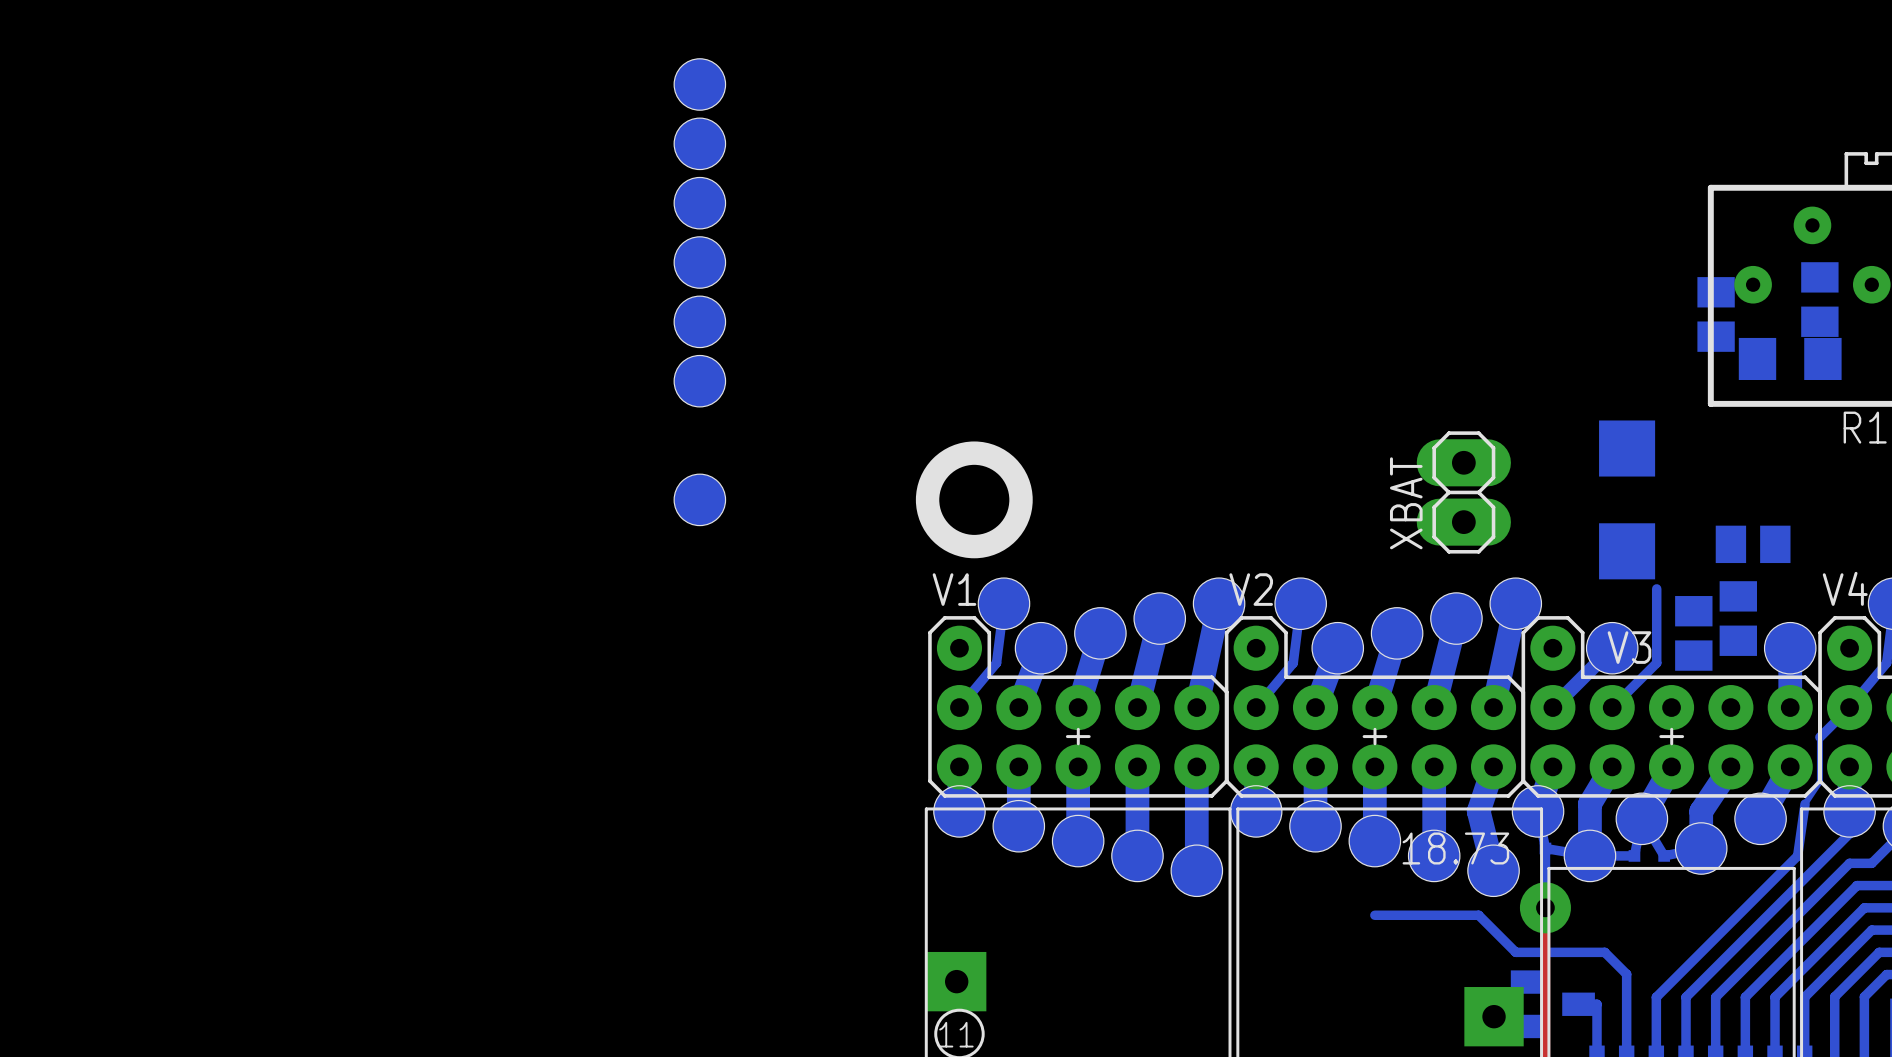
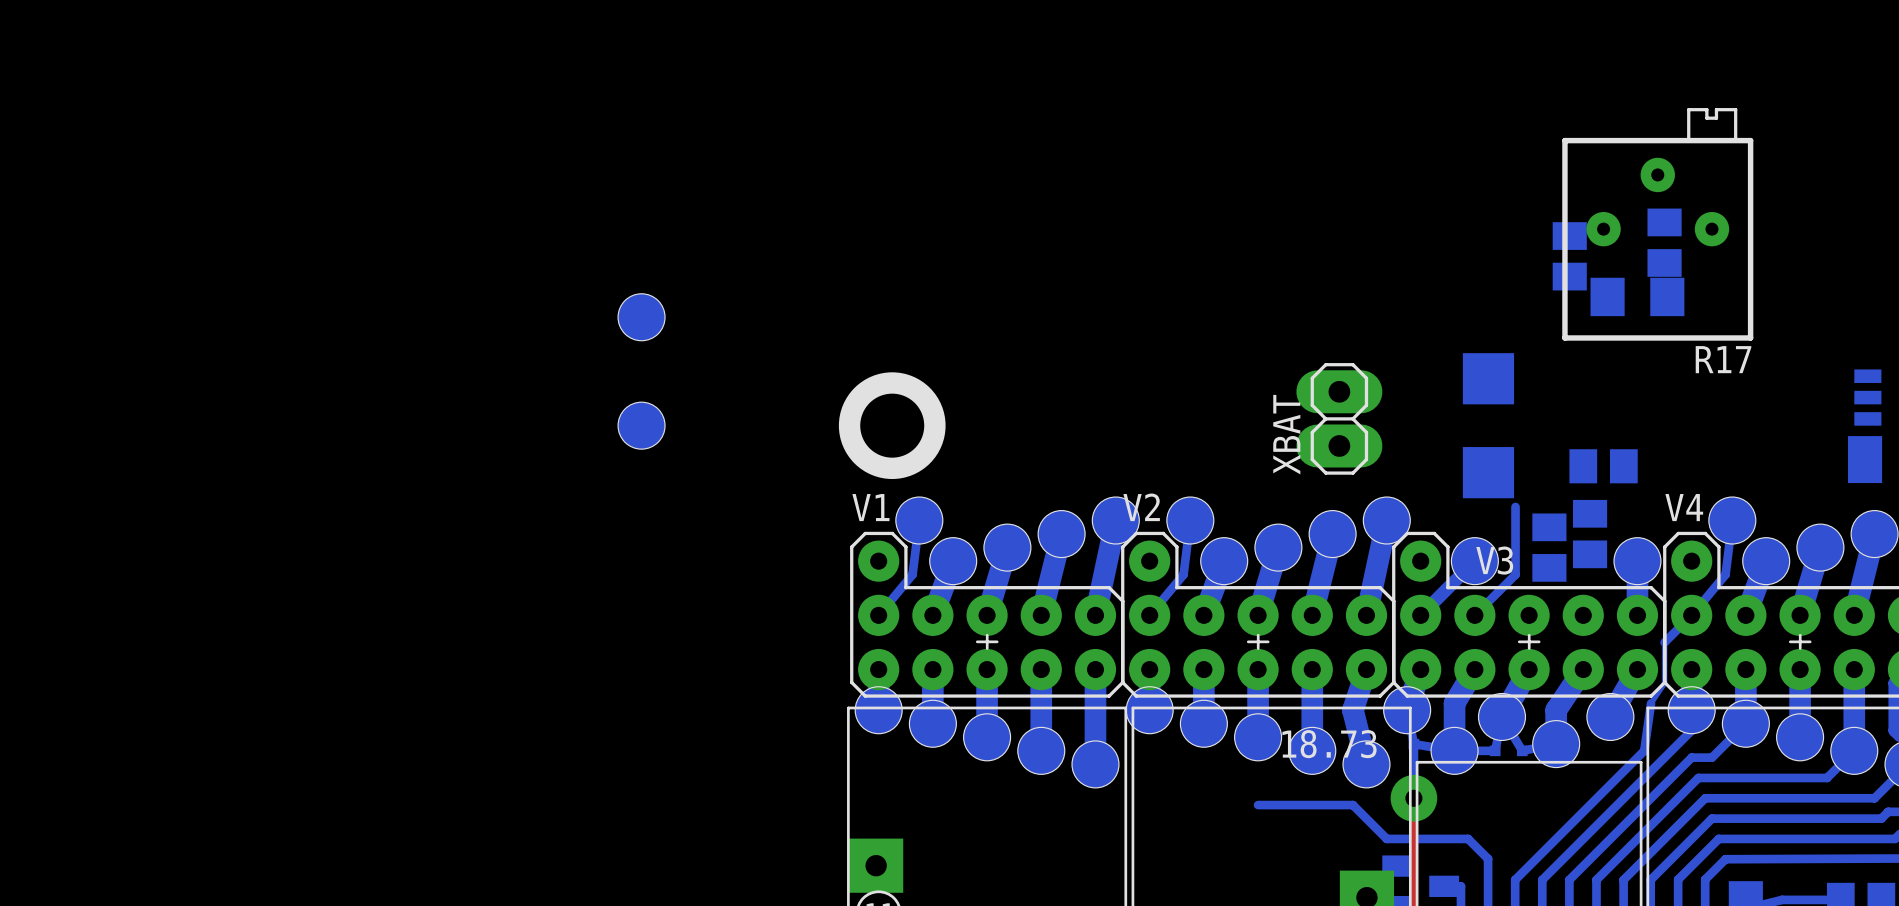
part: (699, 84) -> none
part: (699, 143) -> none
part: (699, 203) -> none
part: (699, 262) -> none
part: (699, 321) -> none

